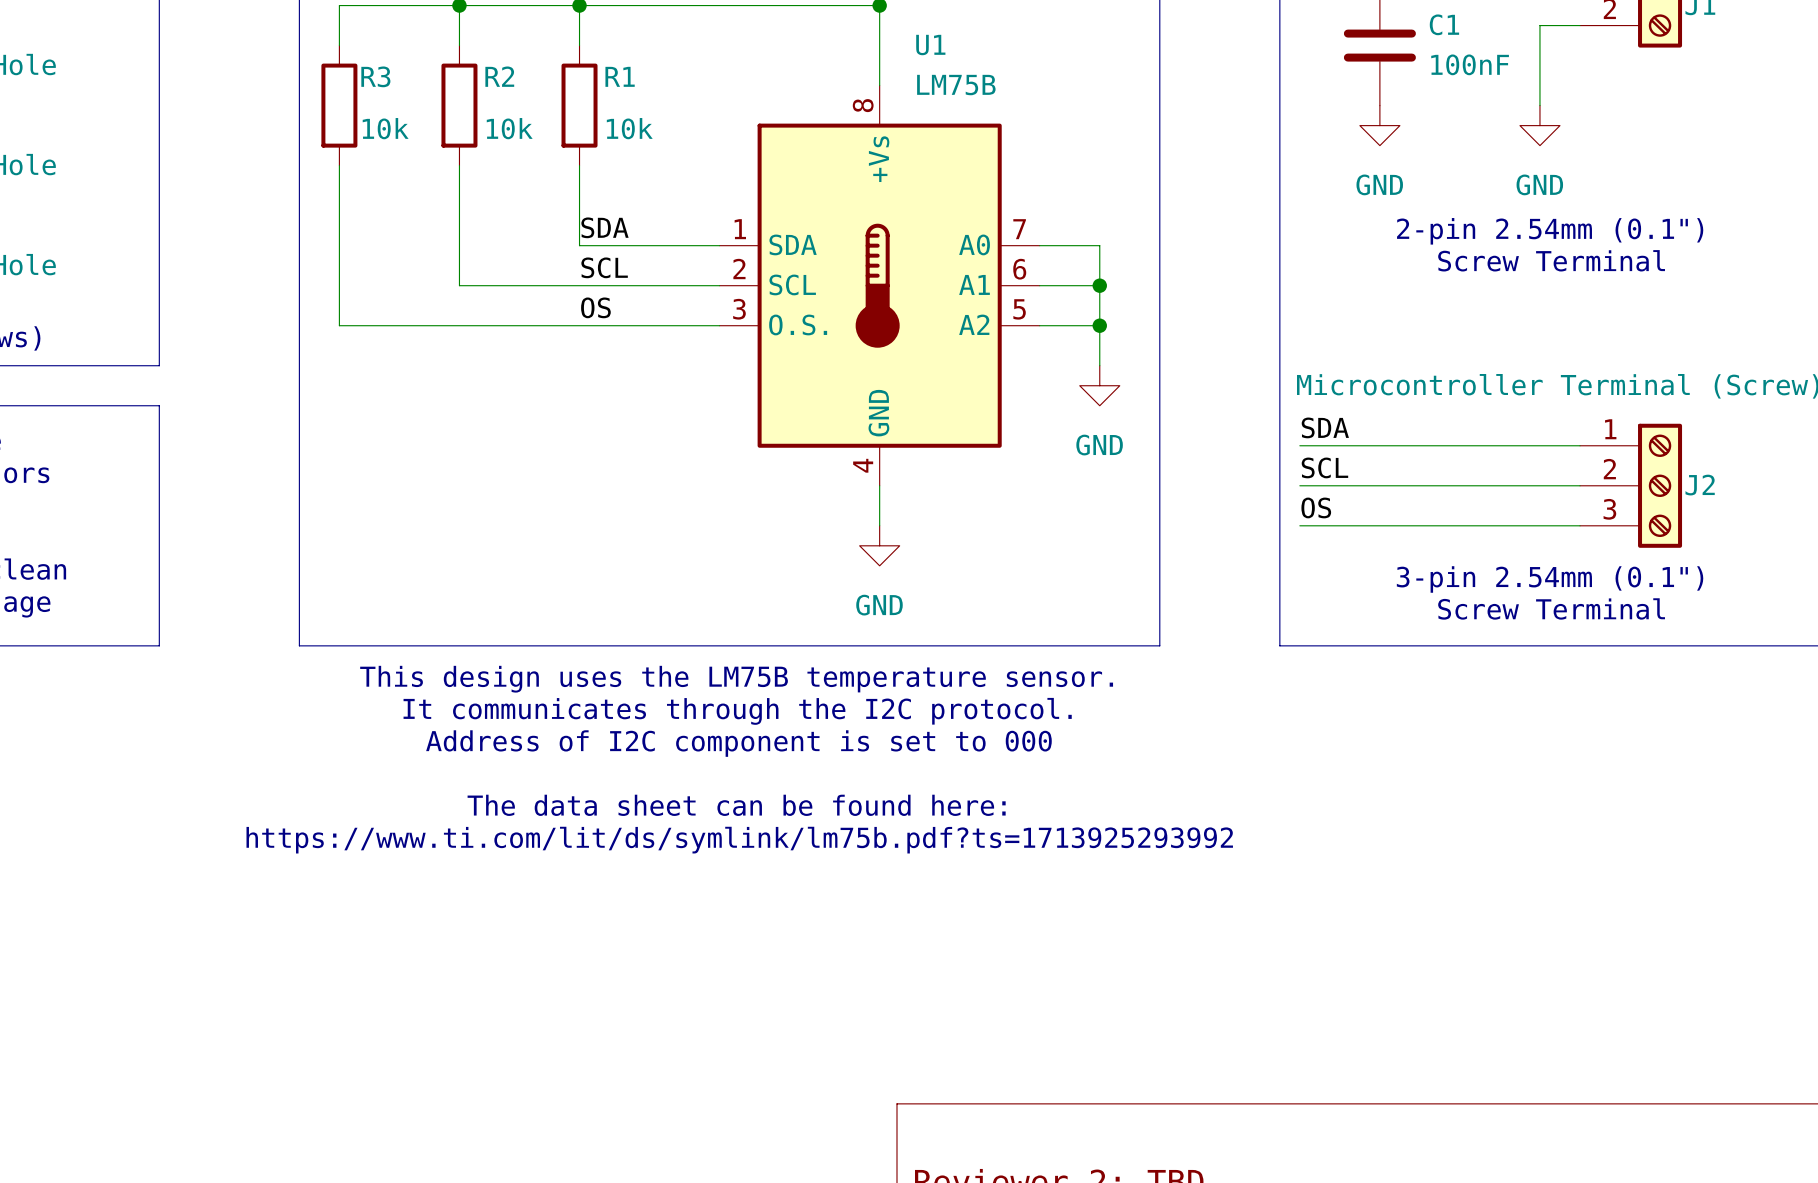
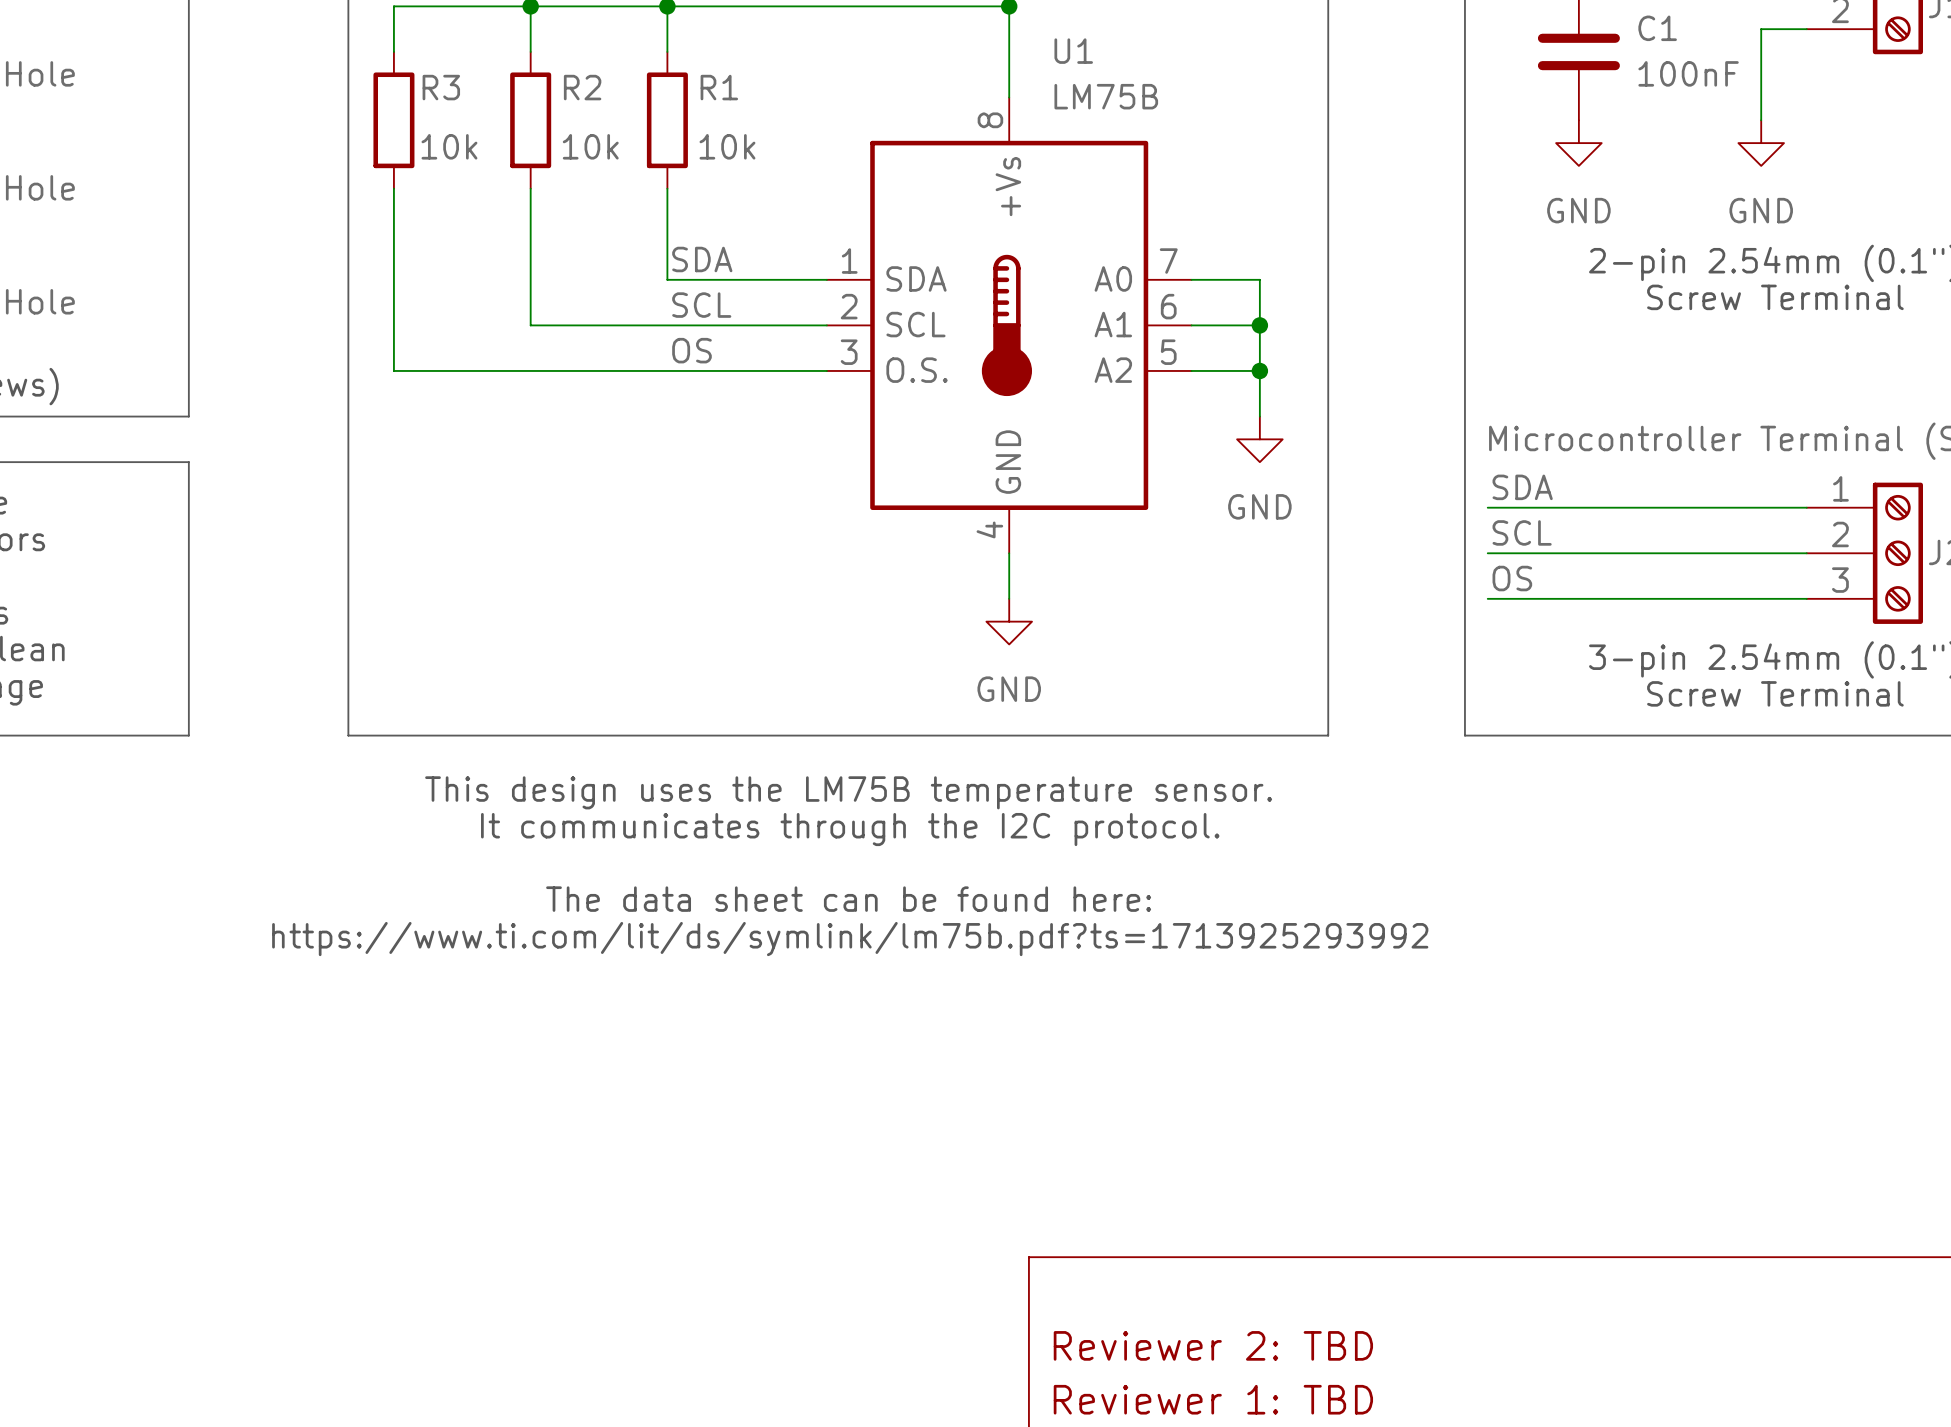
text position: This design uses the LM75B temperature sensor. (736, 679) -> This design uses the LM75B temperature sensor. (848, 792)
text position: It communicates through the I2C protocol. (737, 711) -> It communicates through the I2C protocol. (850, 829)
text: Address of I2C component is set to 000 (738, 743) -> none
text position: The data sheet can be found here: (736, 805) -> The data sheet can be found here: (848, 899)
text position: https://www.ti.com/lit/ds/symlink/lm75b.pdf?ts=1713925293992 (739, 840) -> https://www.ti.com/lit/ds/symlink/lm75b.pdf?ts=1713925293992 (850, 939)

